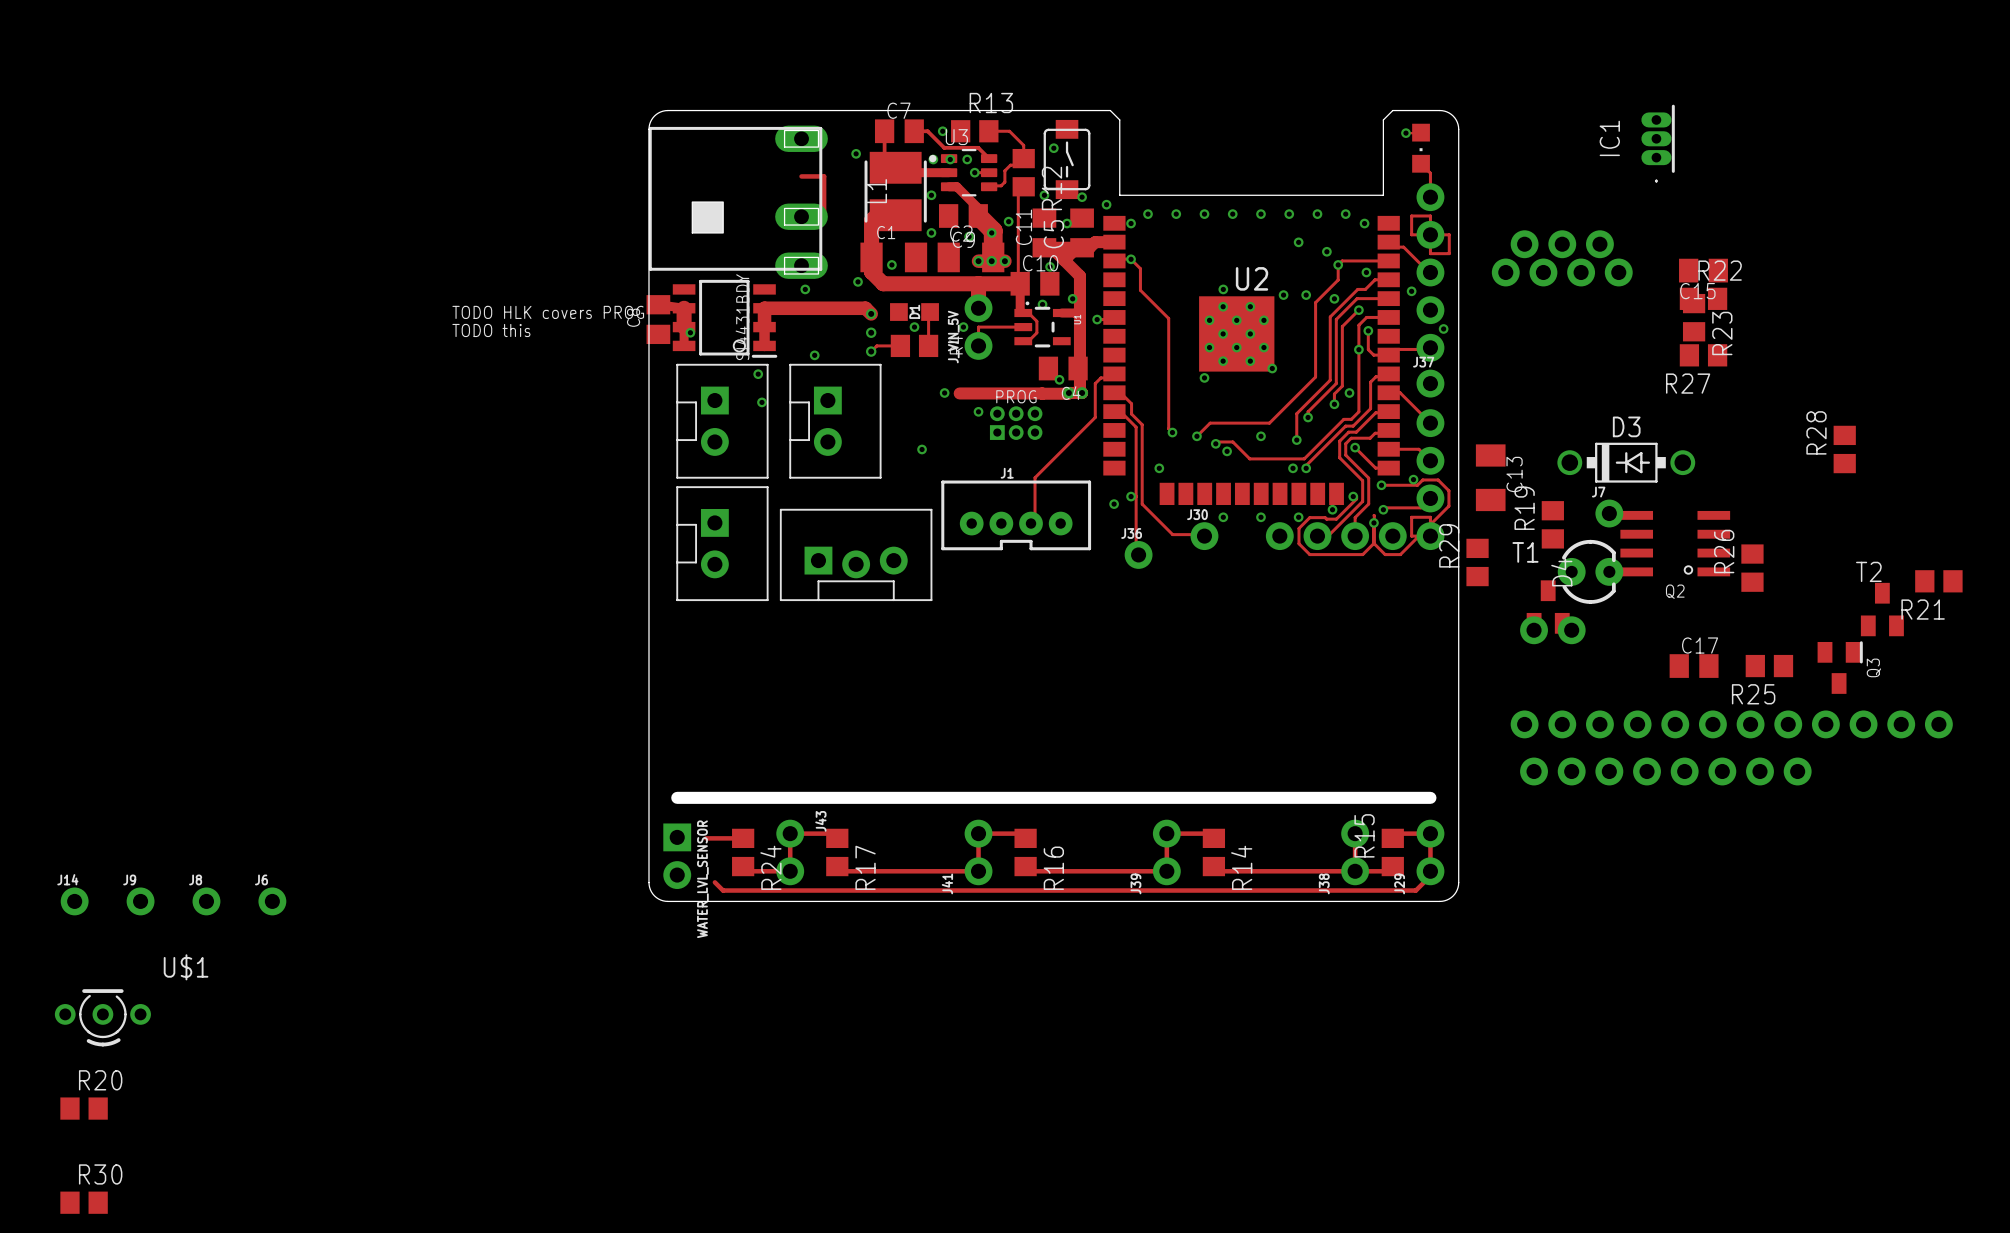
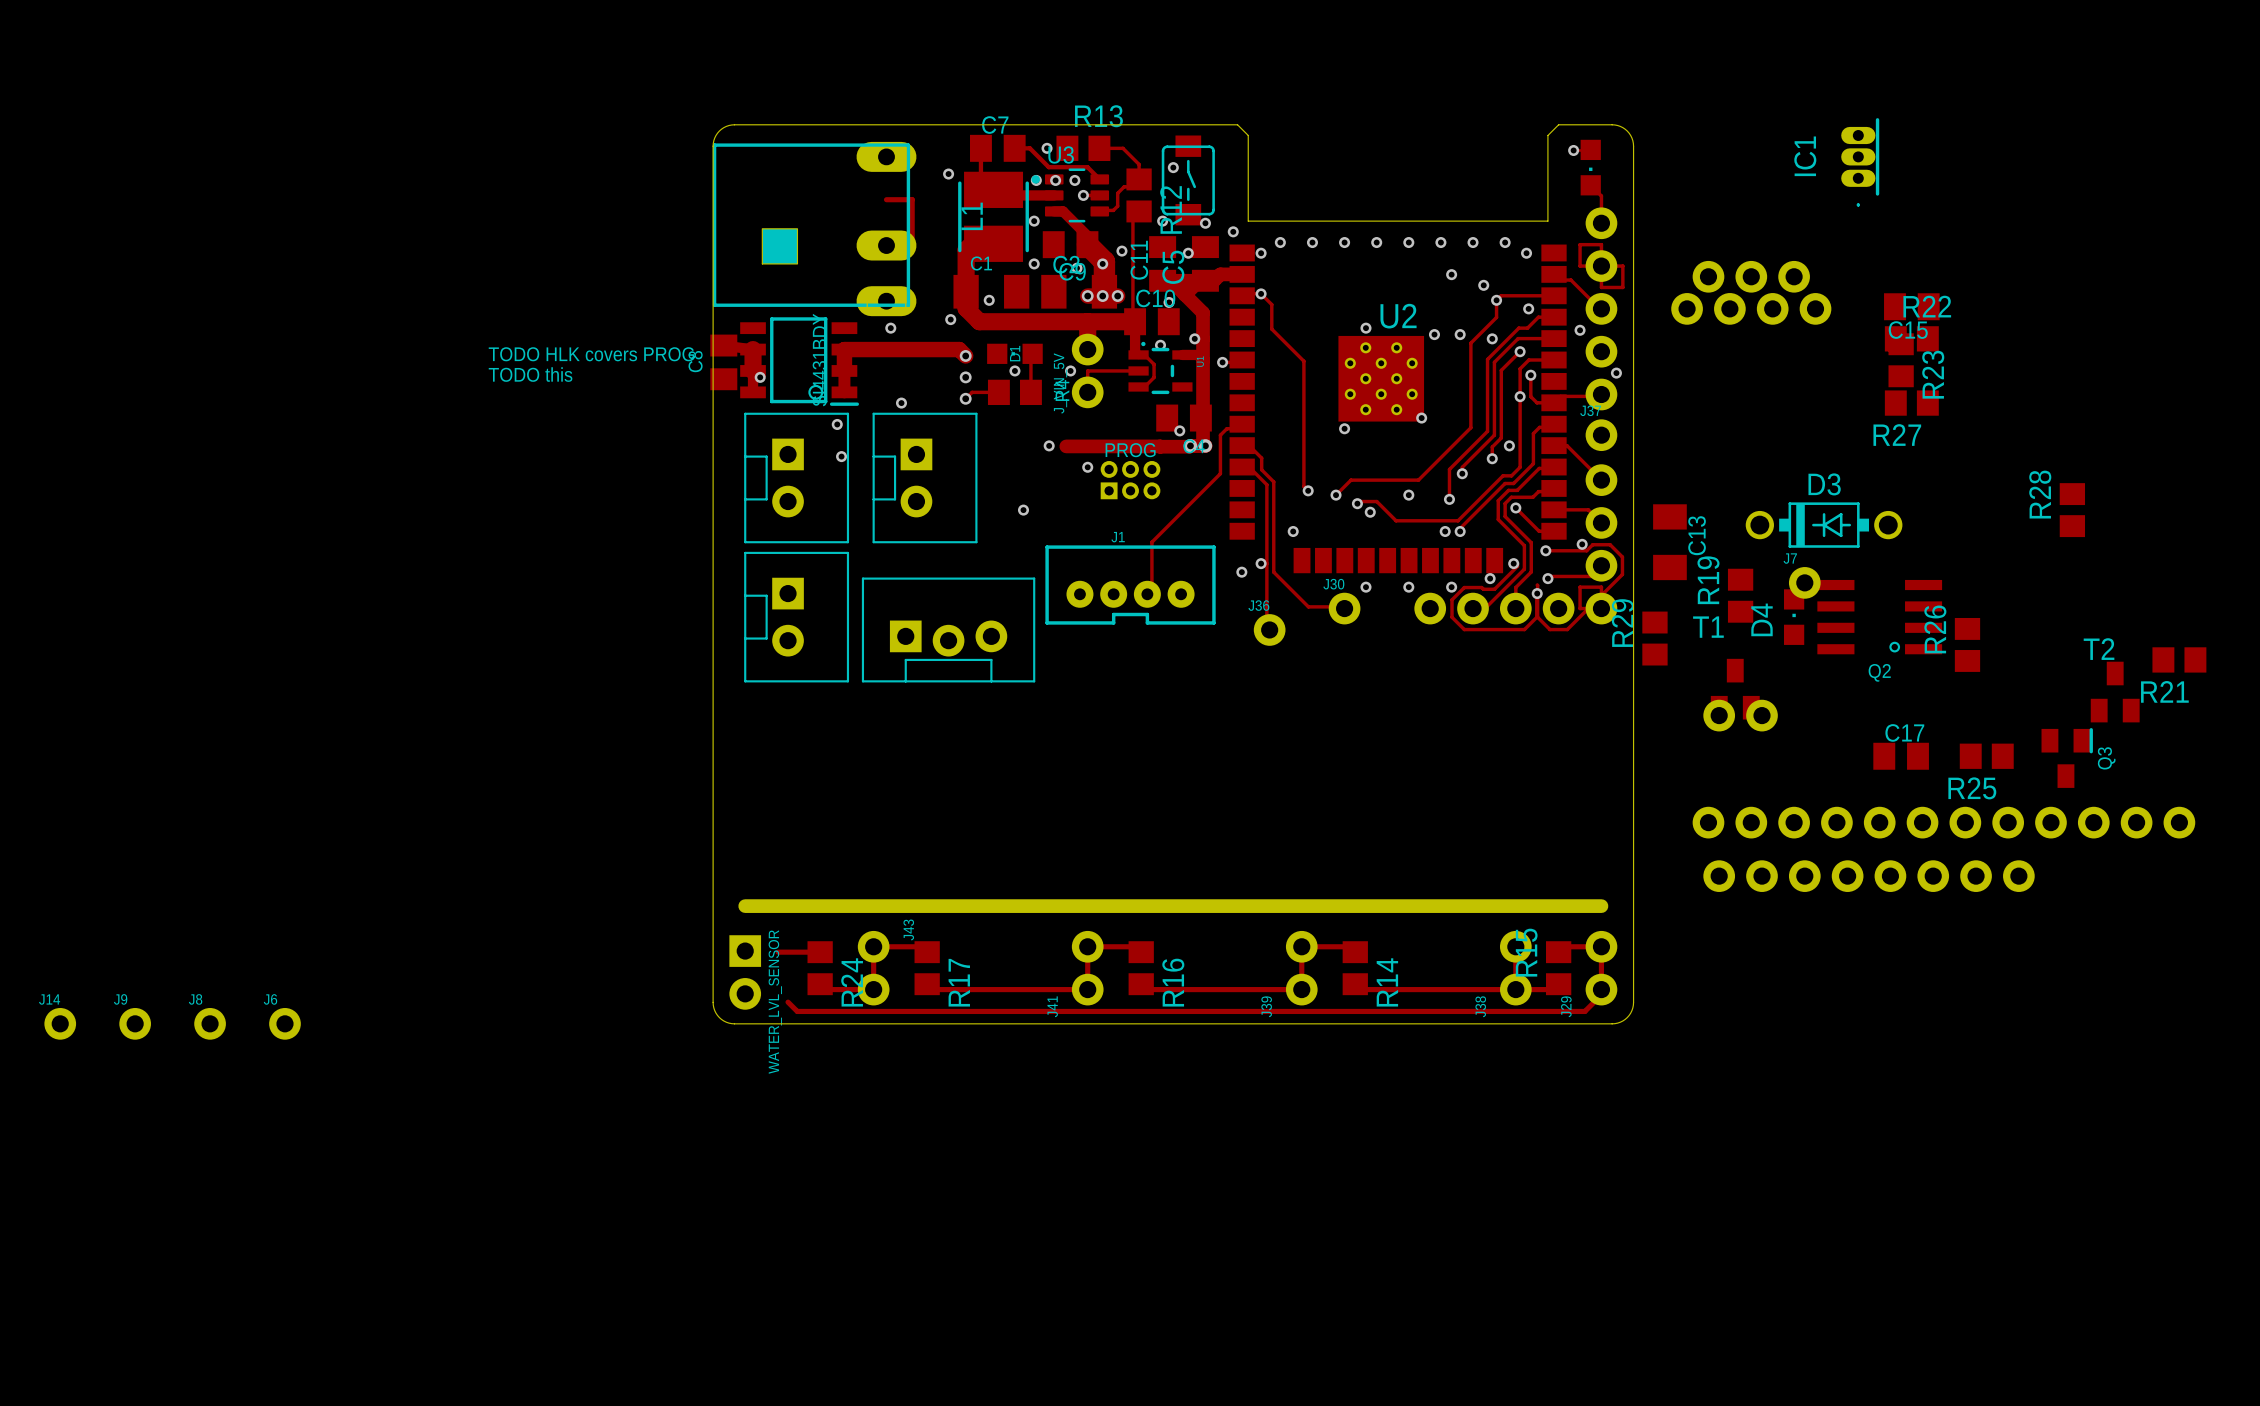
D4 footprint: [1557, 539, 1624, 604] -> [1783, 589, 1805, 645]
U$1: (102, 1017) -> none
R20: (84, 1108) -> none
R30: (84, 1202) -> none

